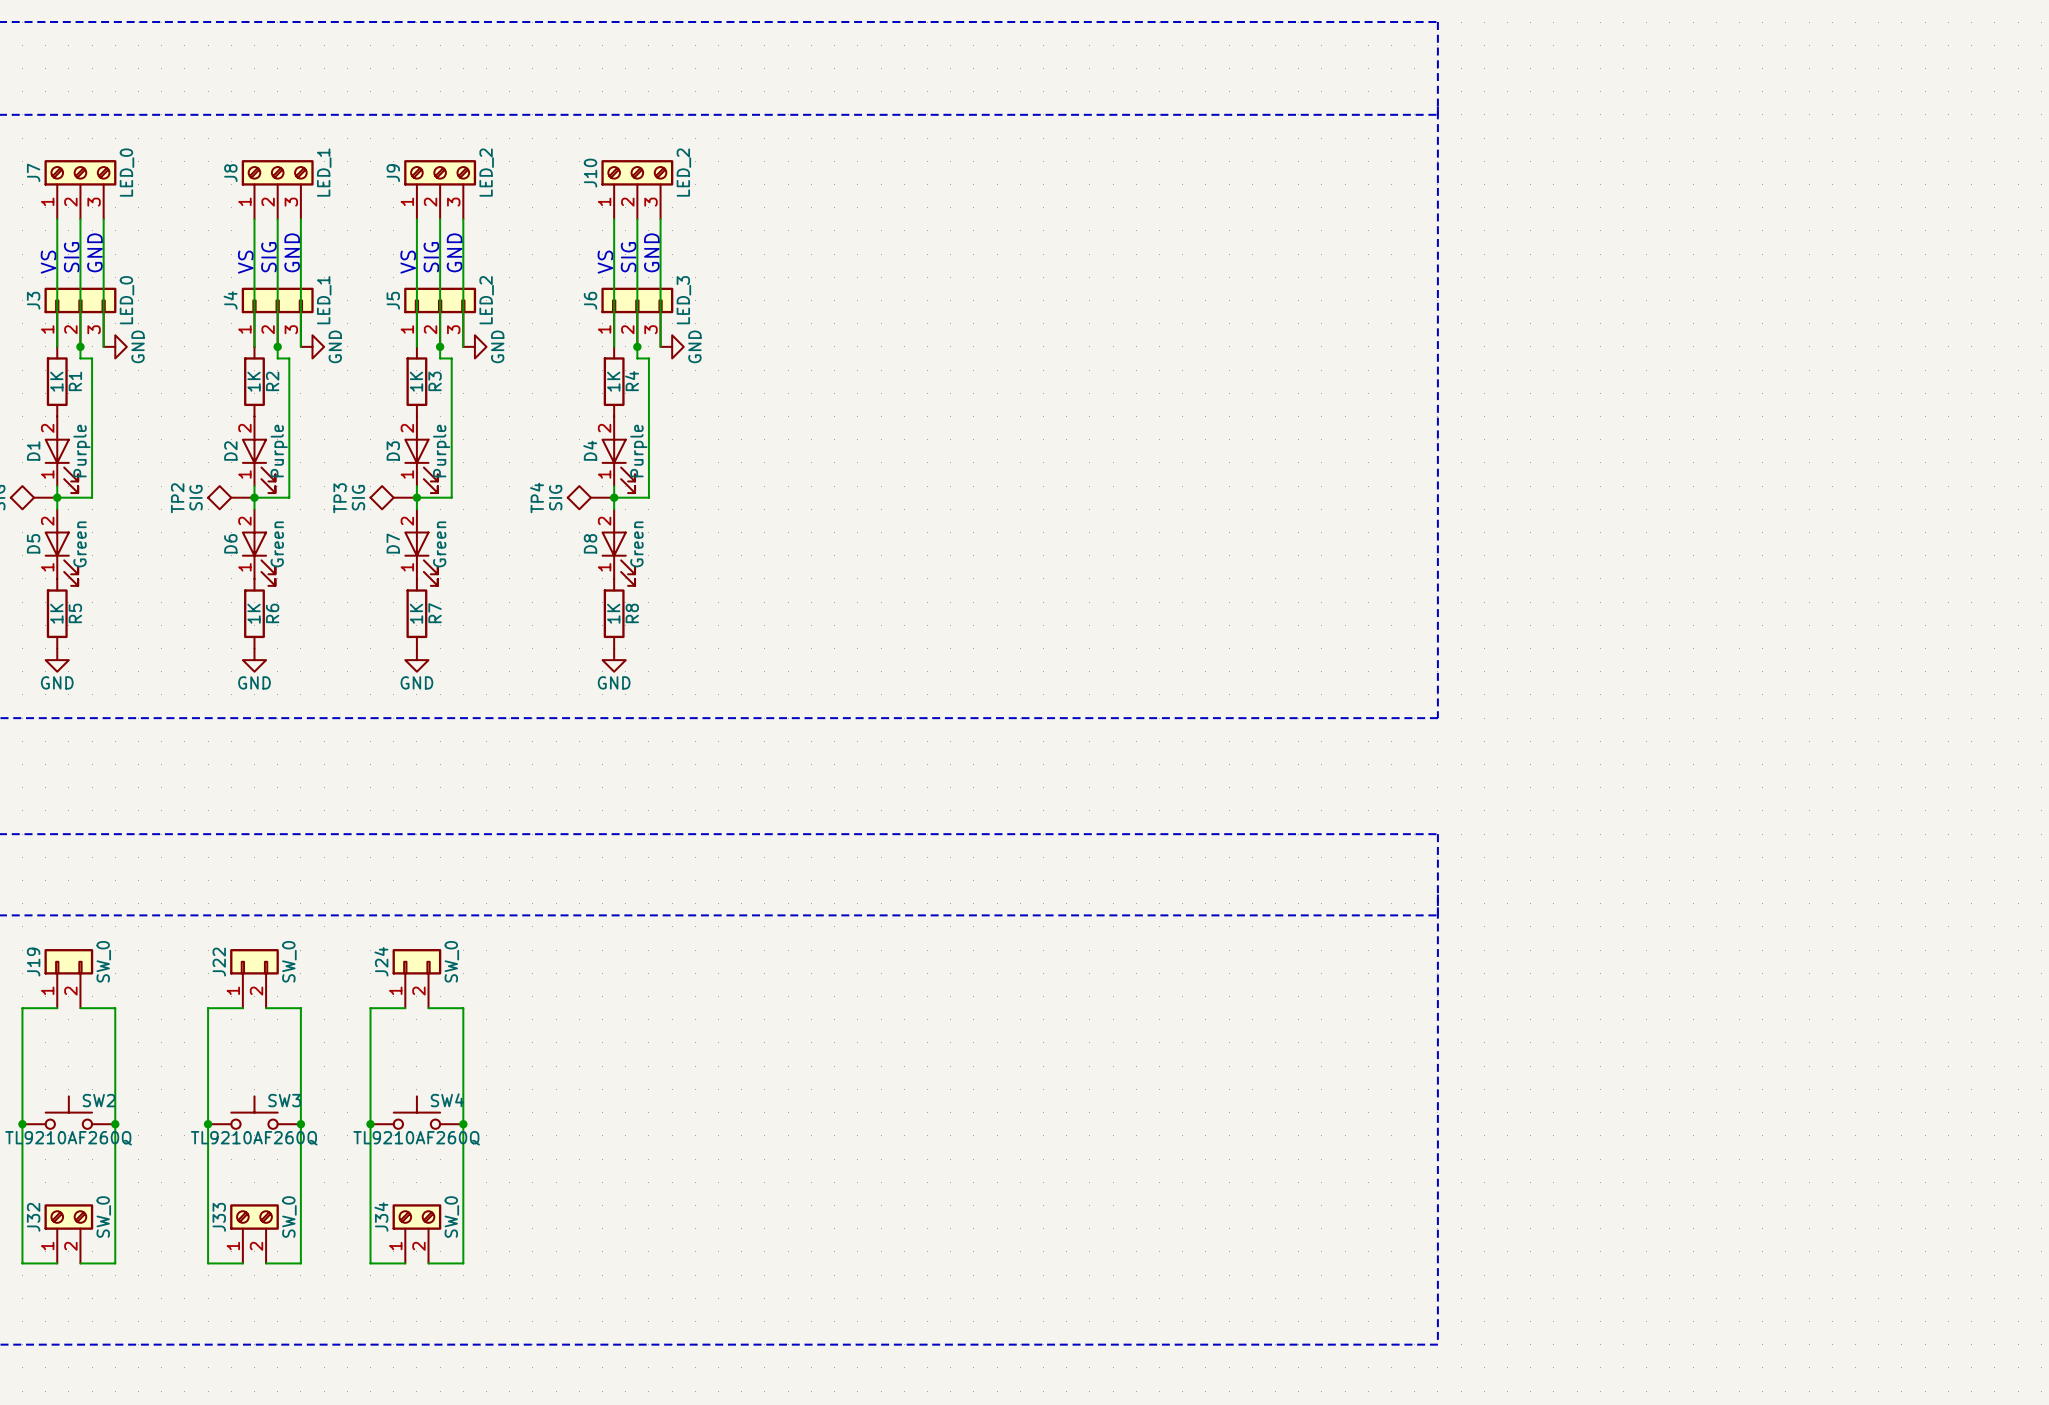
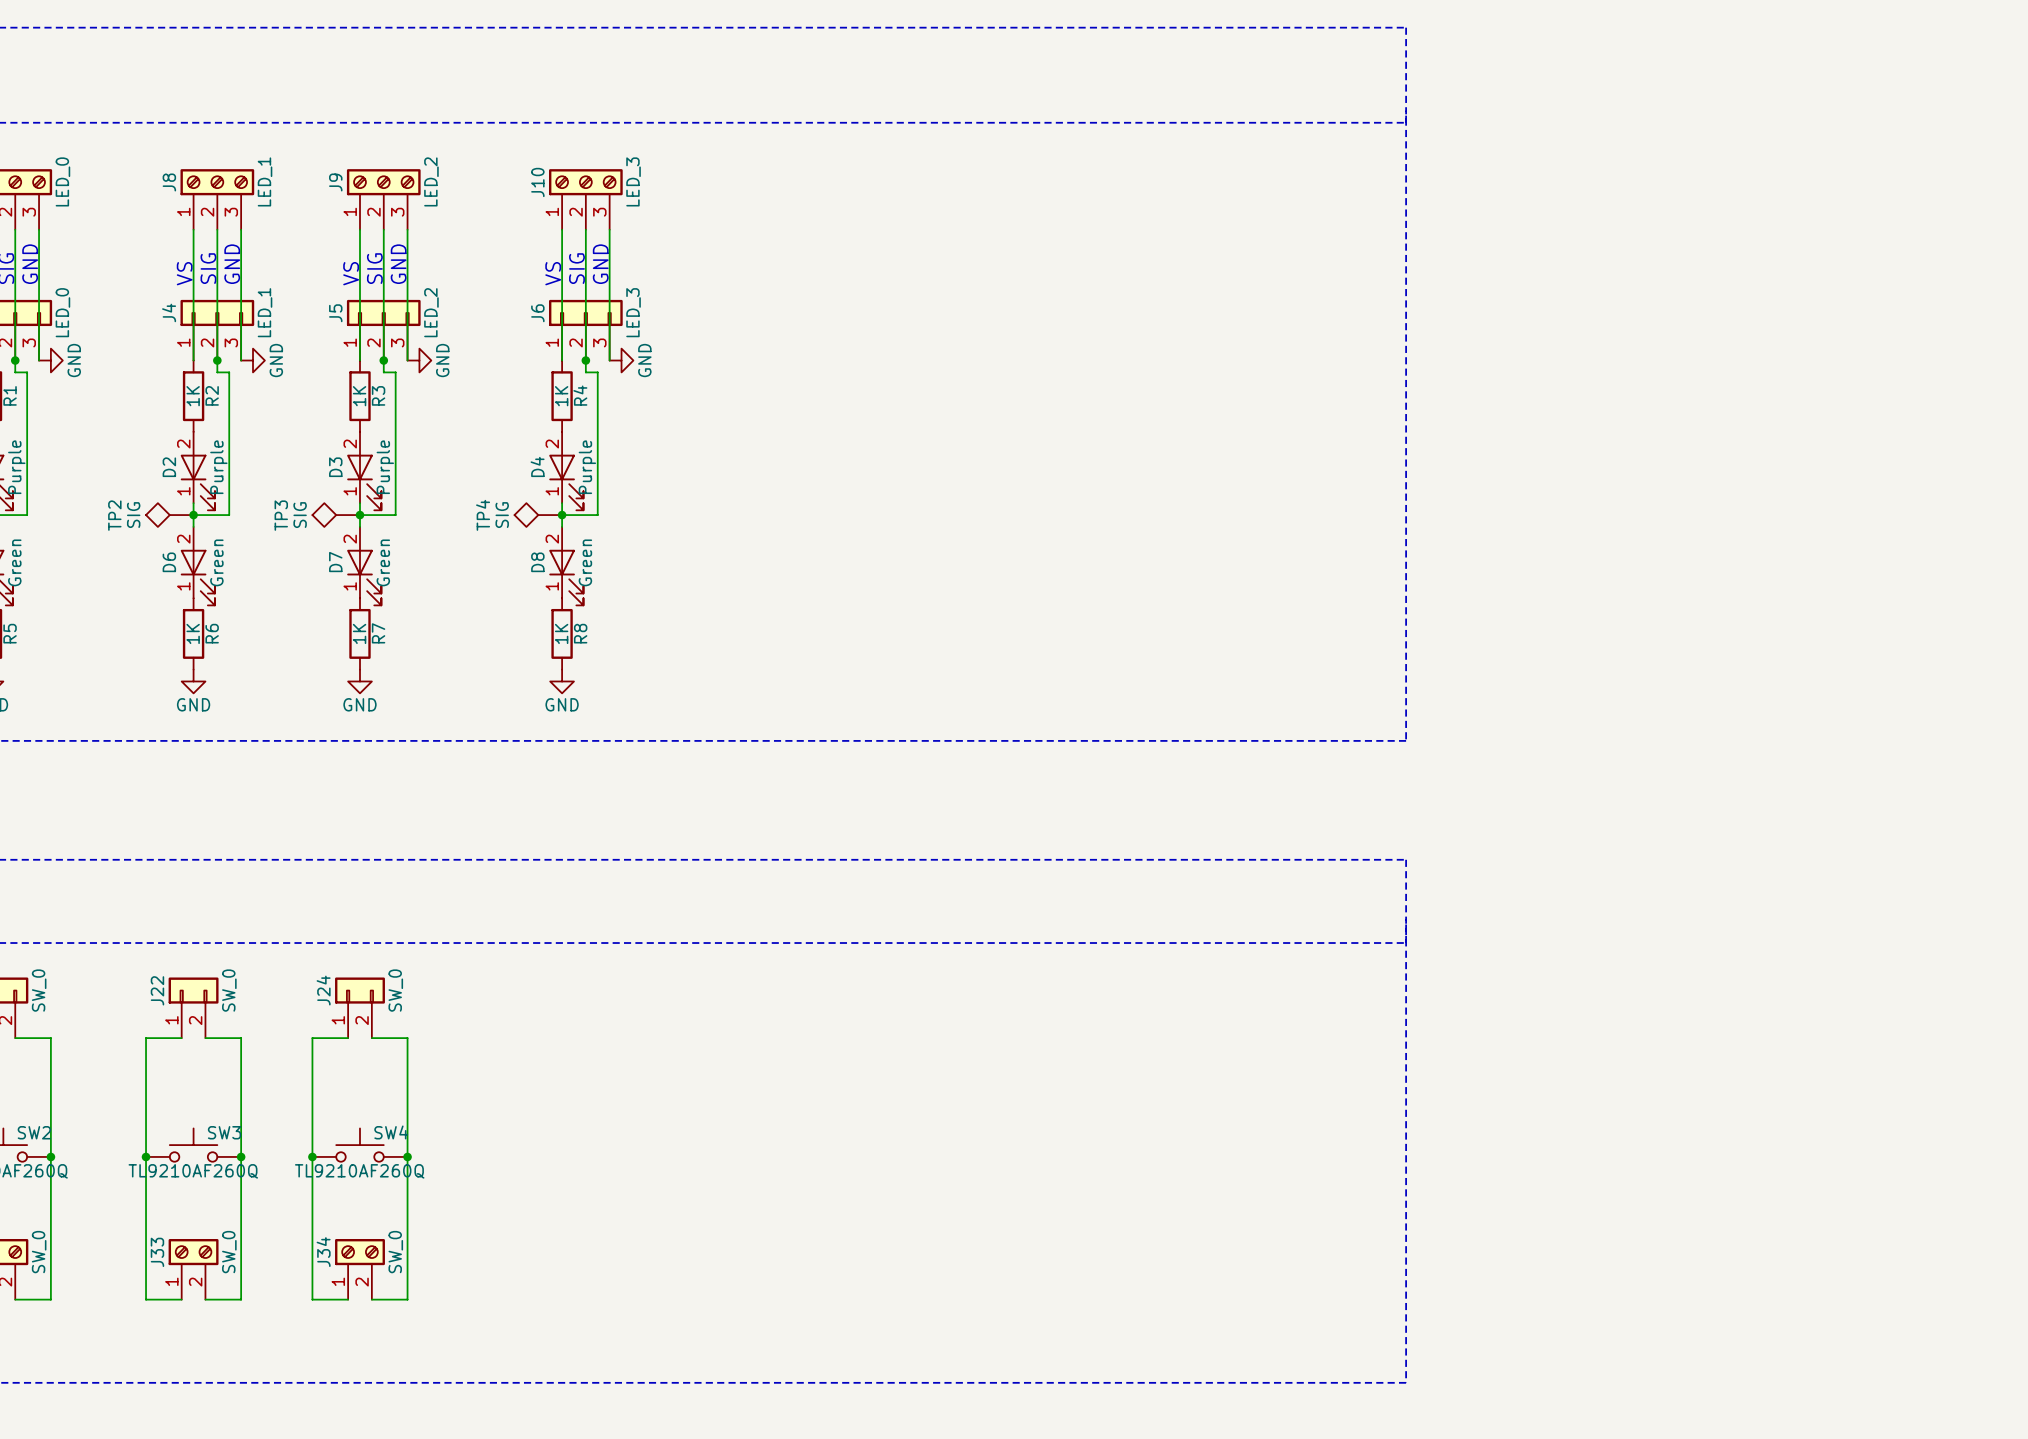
J10 value: LED_2 (683, 172) -> LED_3 (633, 181)

